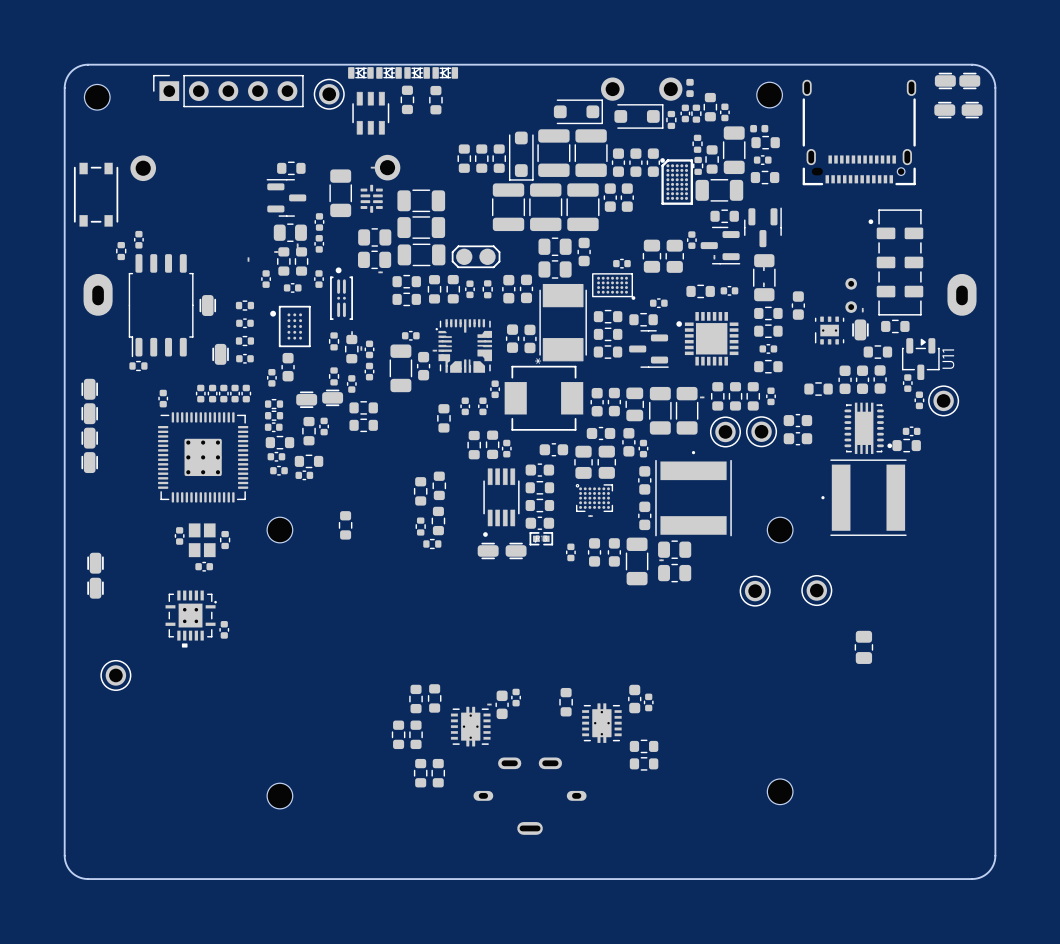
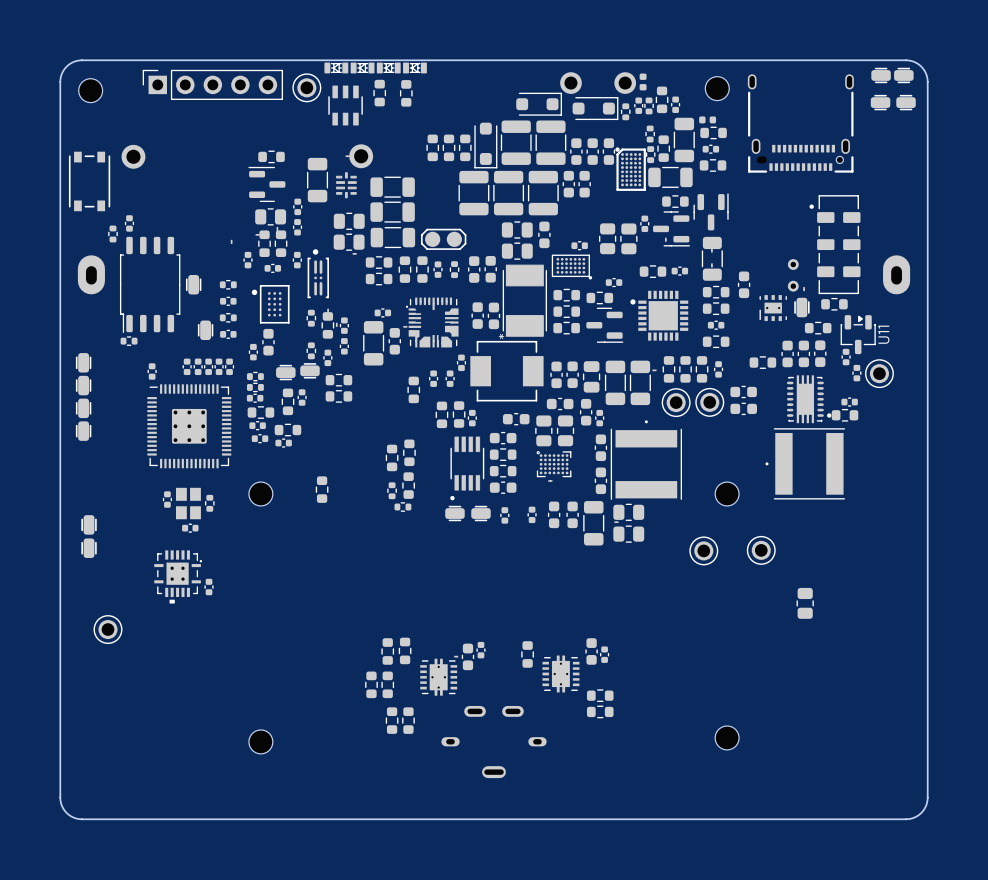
part: (541, 538) -> none
part: none -> (504, 515)

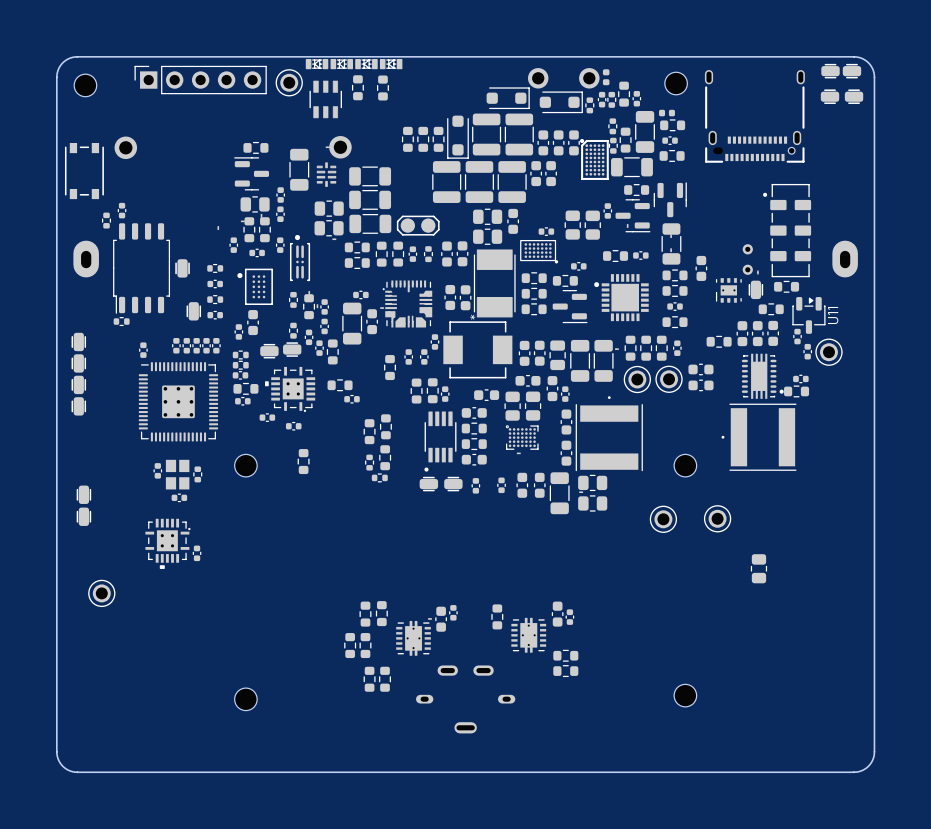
part: none -> (319, 348)
part: none -> (332, 351)
part: (338, 380) -> none
part: (338, 396) -> none
part: (302, 397) -> none
part: (287, 401) -> none
part: none -> (340, 385)
part: none -> (290, 389)
part: none -> (352, 399)
part: (287, 430) -> none
part: (260, 438) -> none
part: none -> (293, 426)

